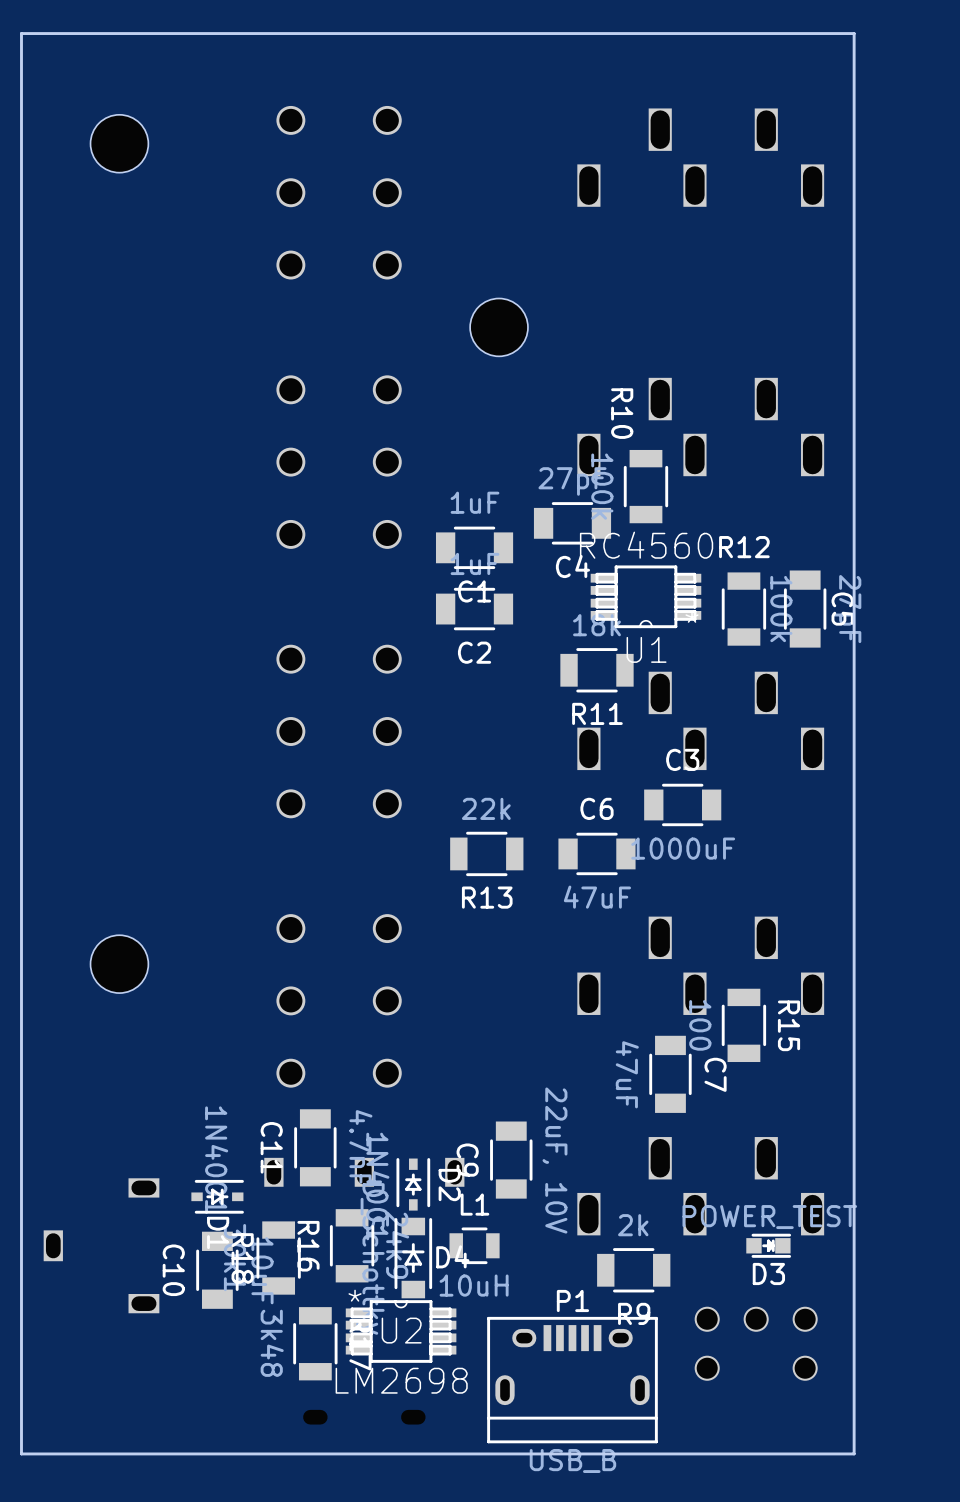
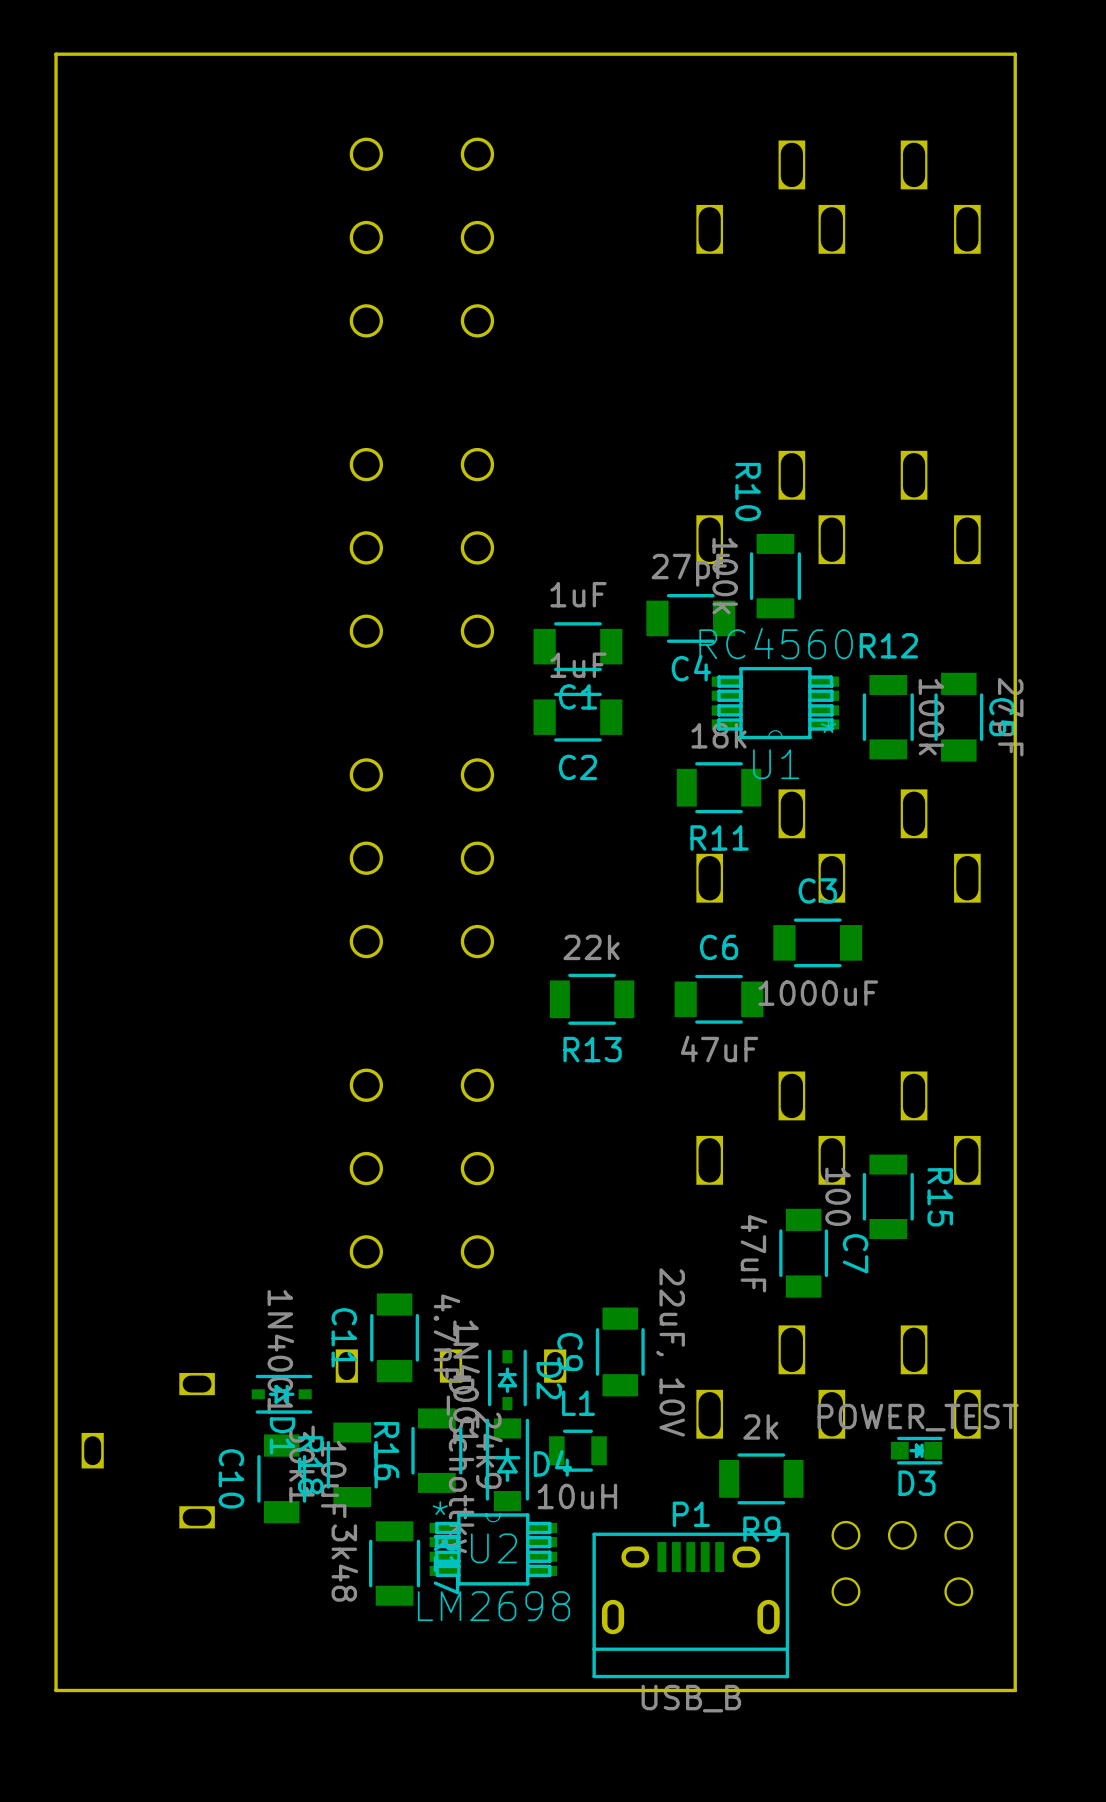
part: (119, 143) -> none
part: (499, 327) -> none
part: (119, 964) -> none

